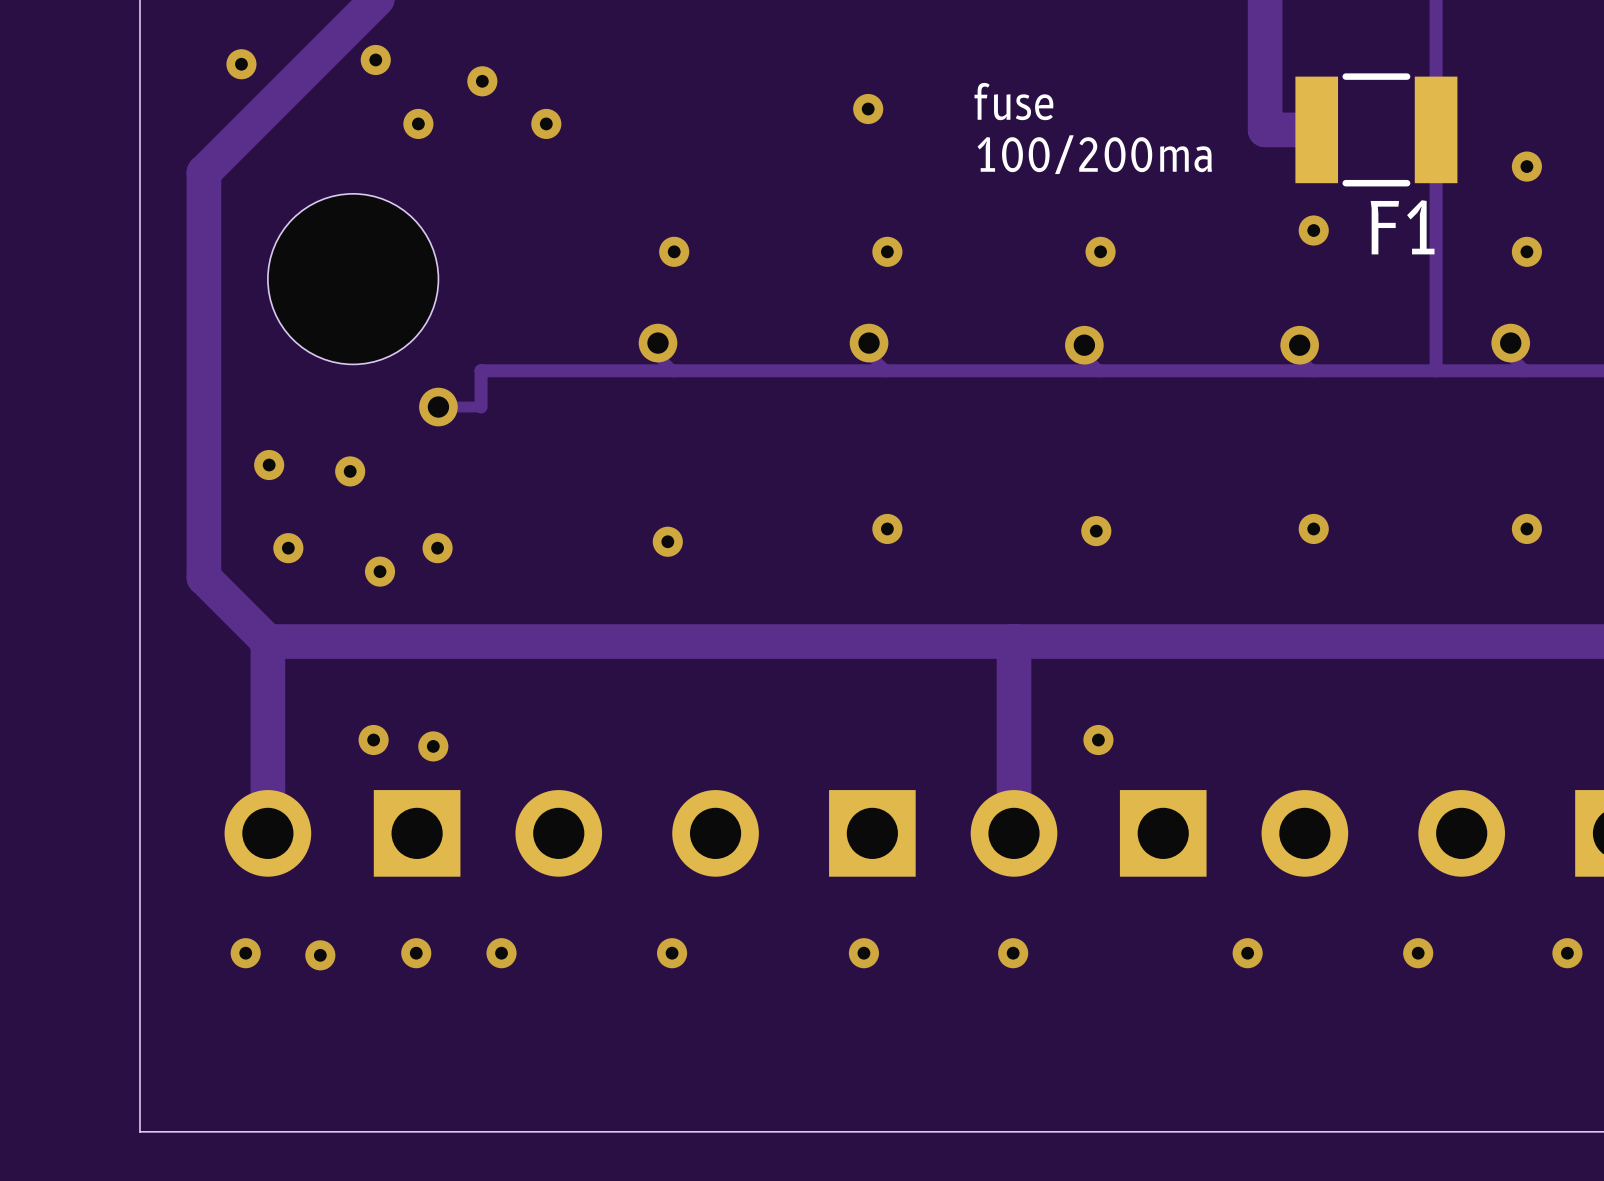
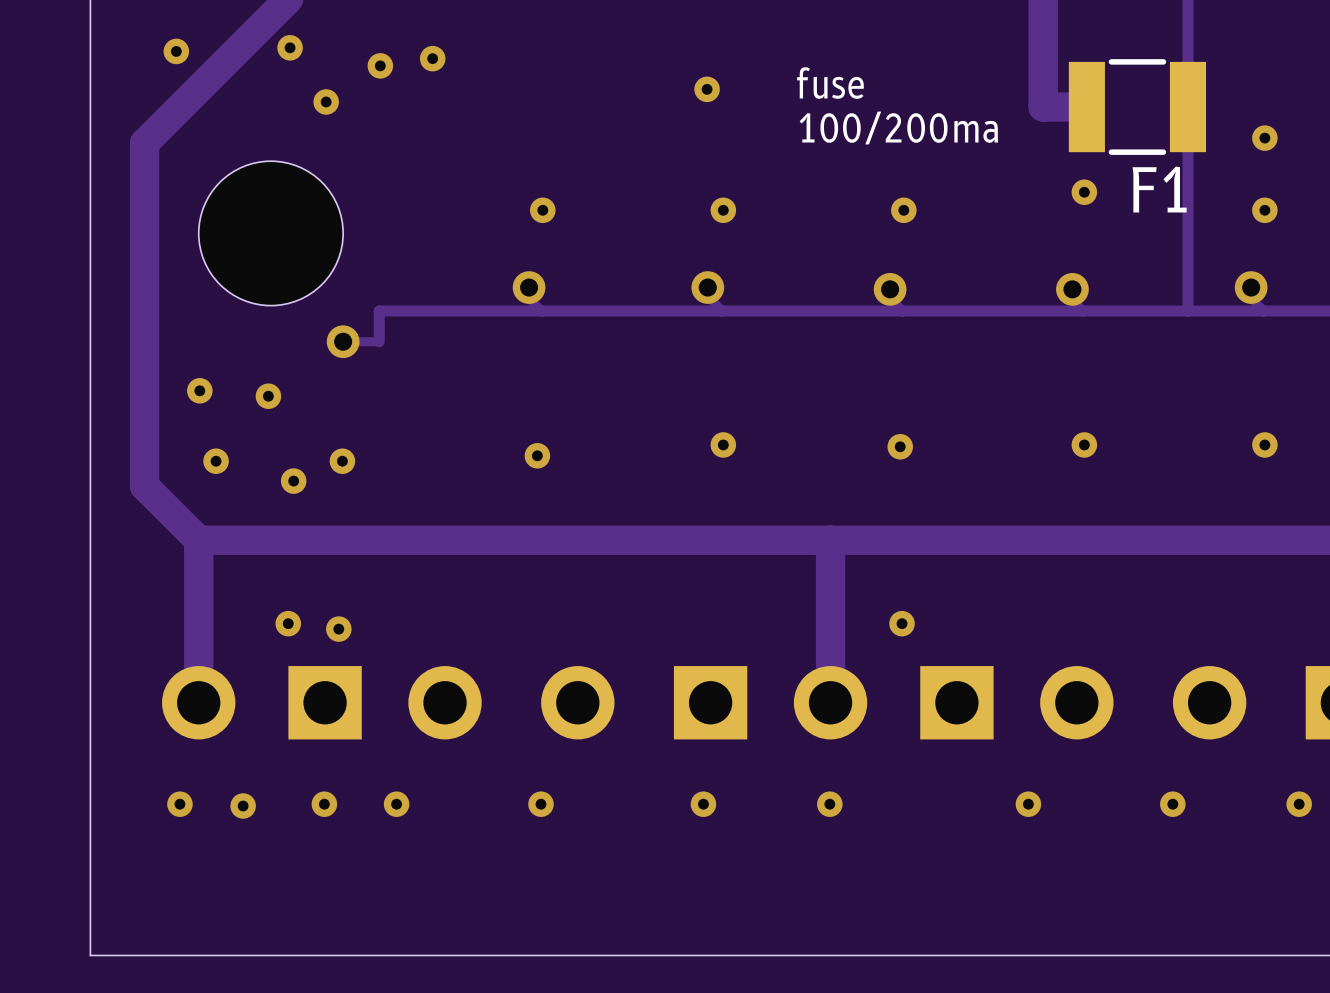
via position: (546, 123) -> (432, 58)

